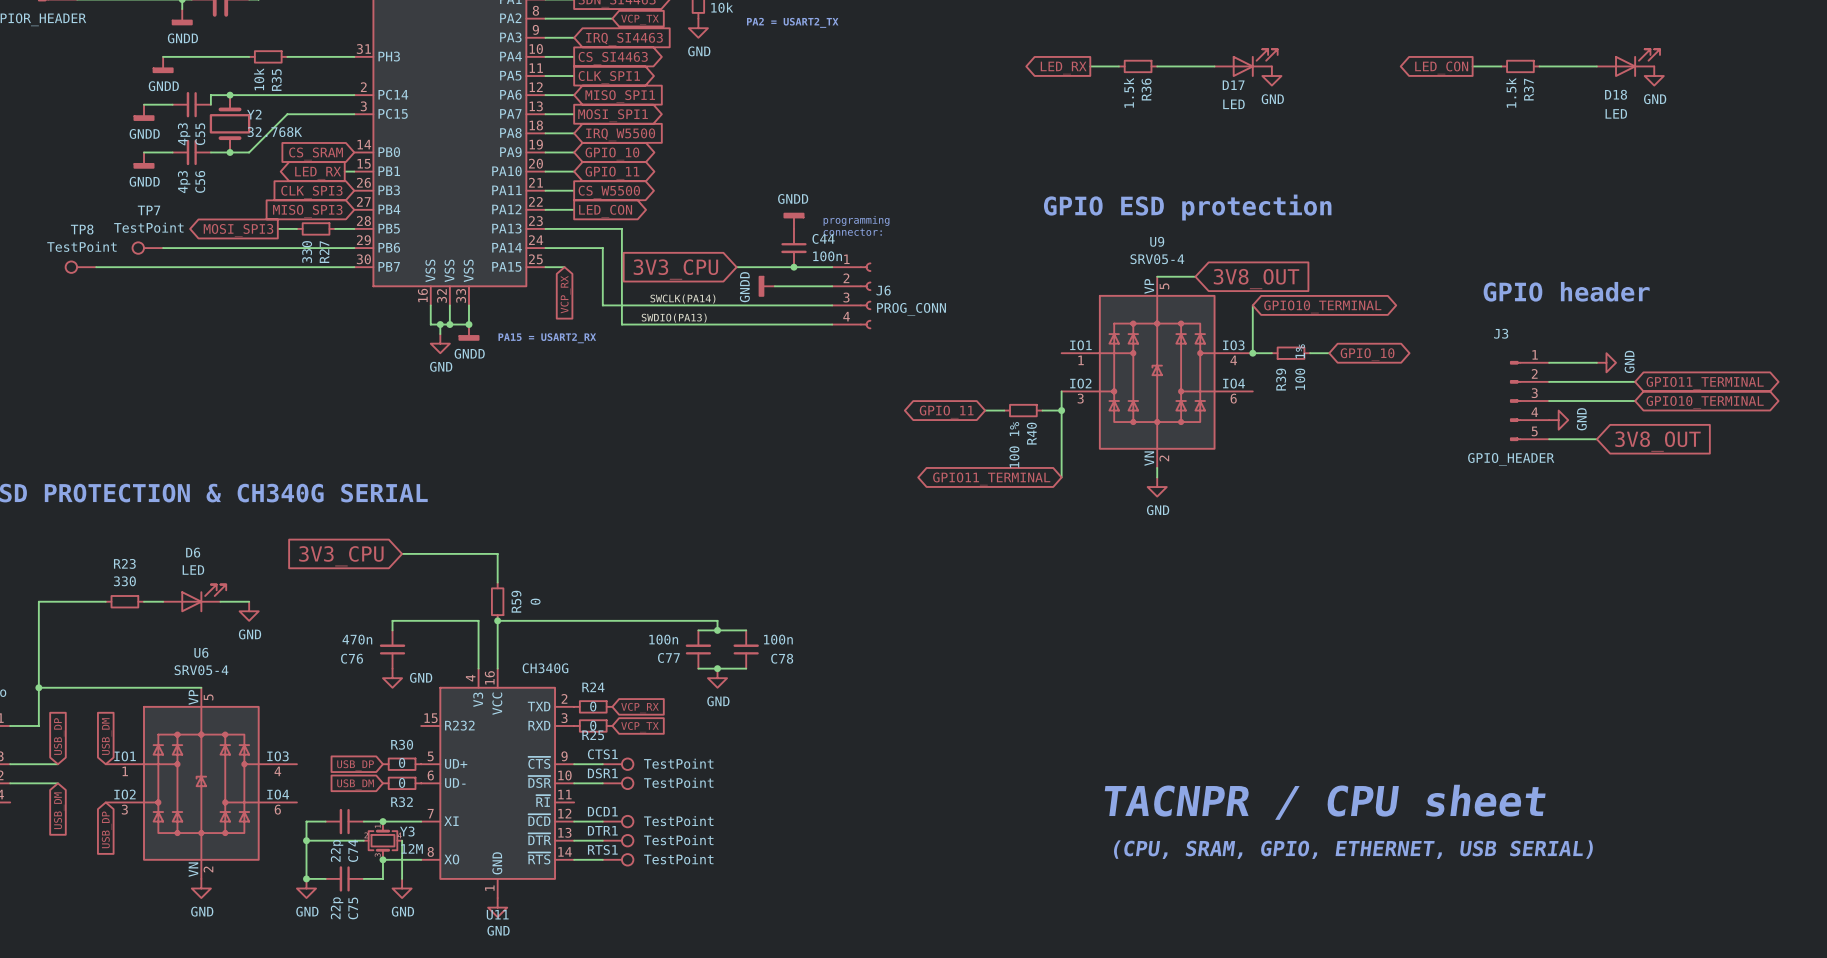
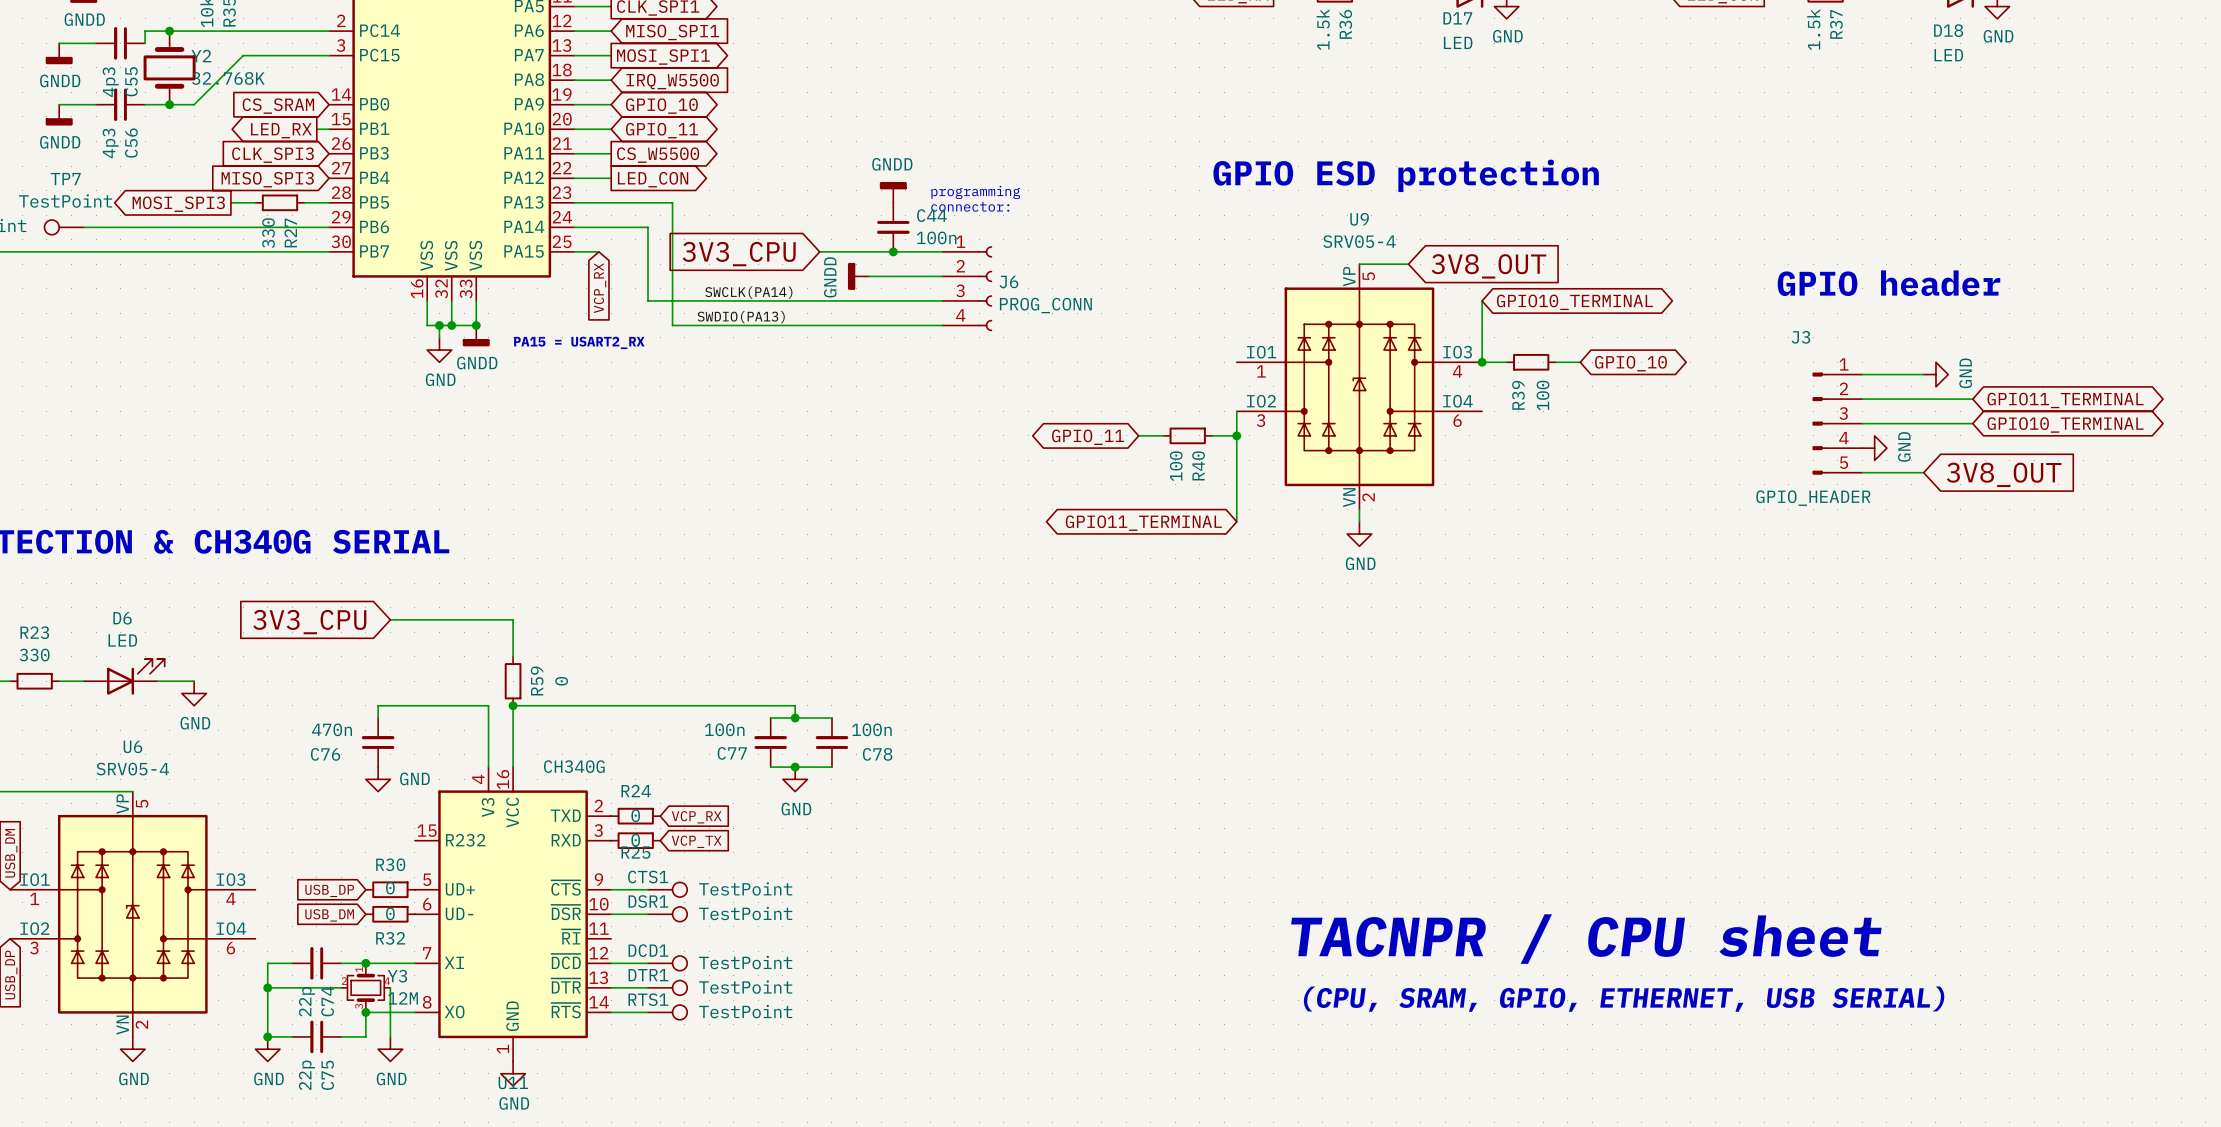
R39 value: 100 1% (1300, 367) -> 100 (1542, 395)
R40 value: 100 1% (1014, 444) -> 100 (1176, 466)

